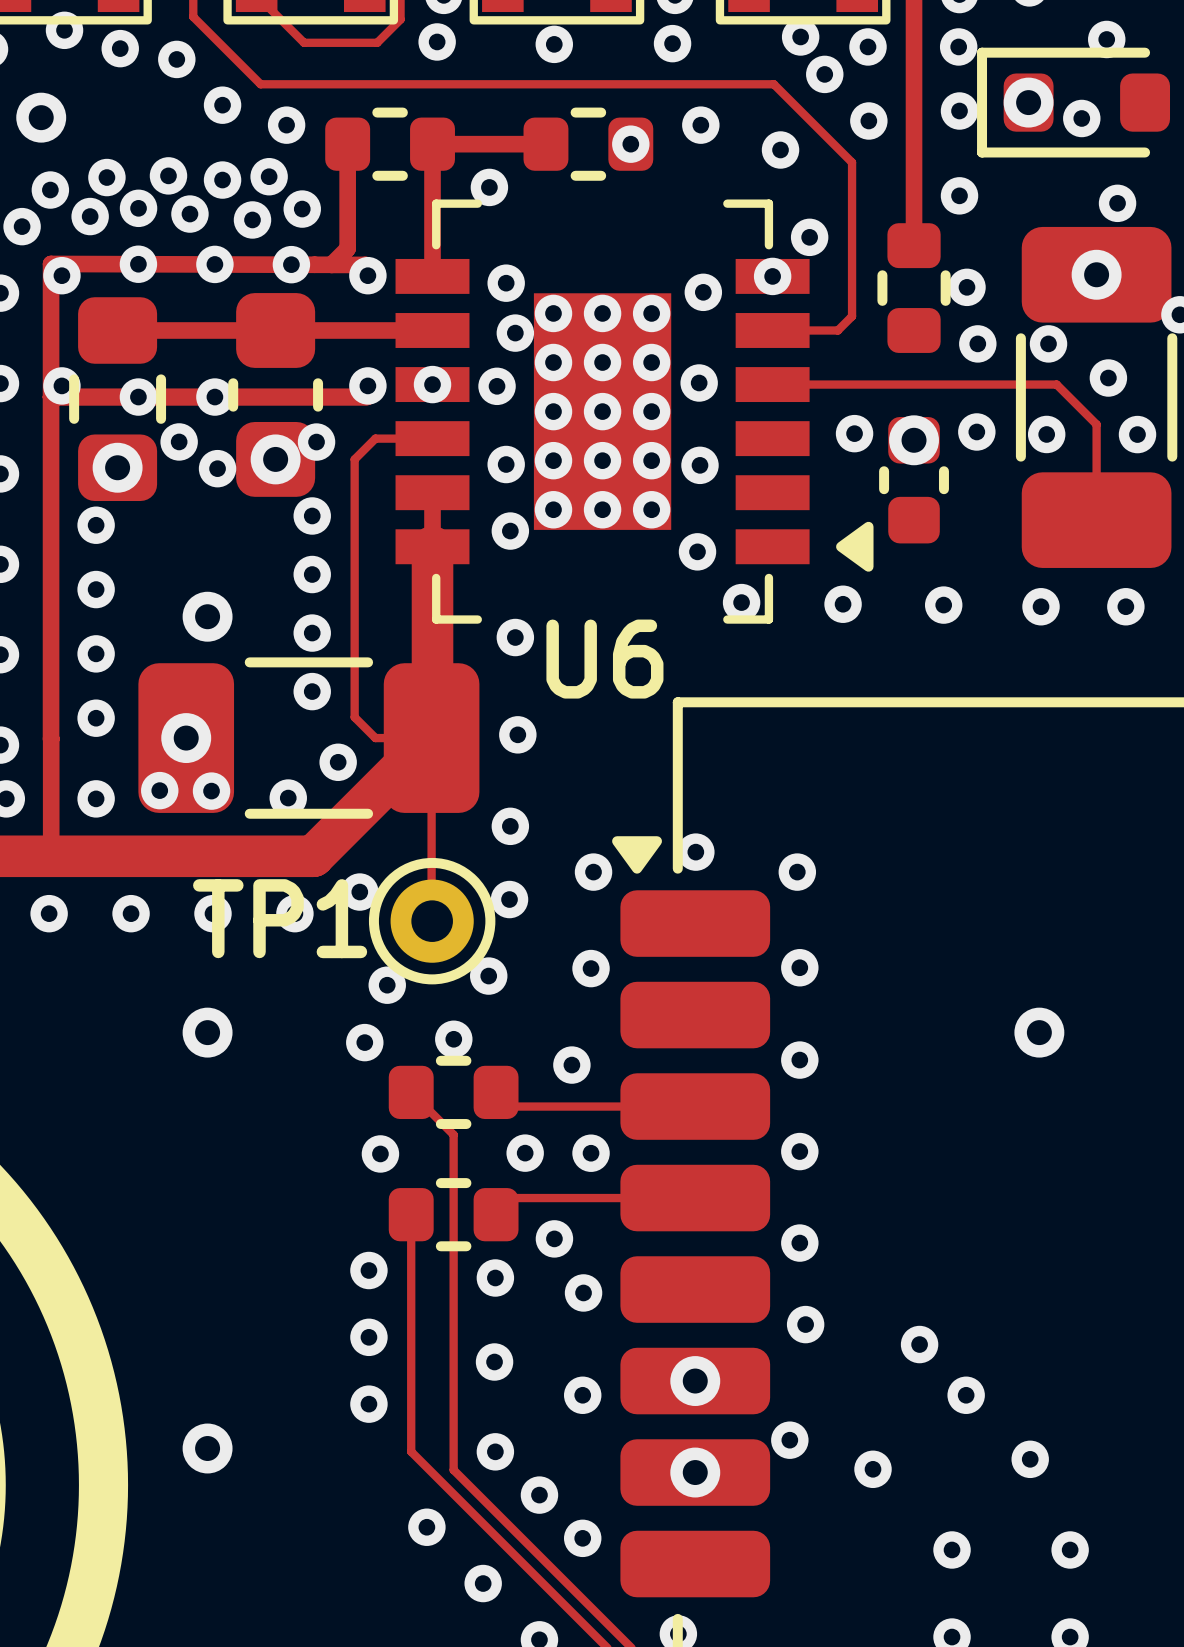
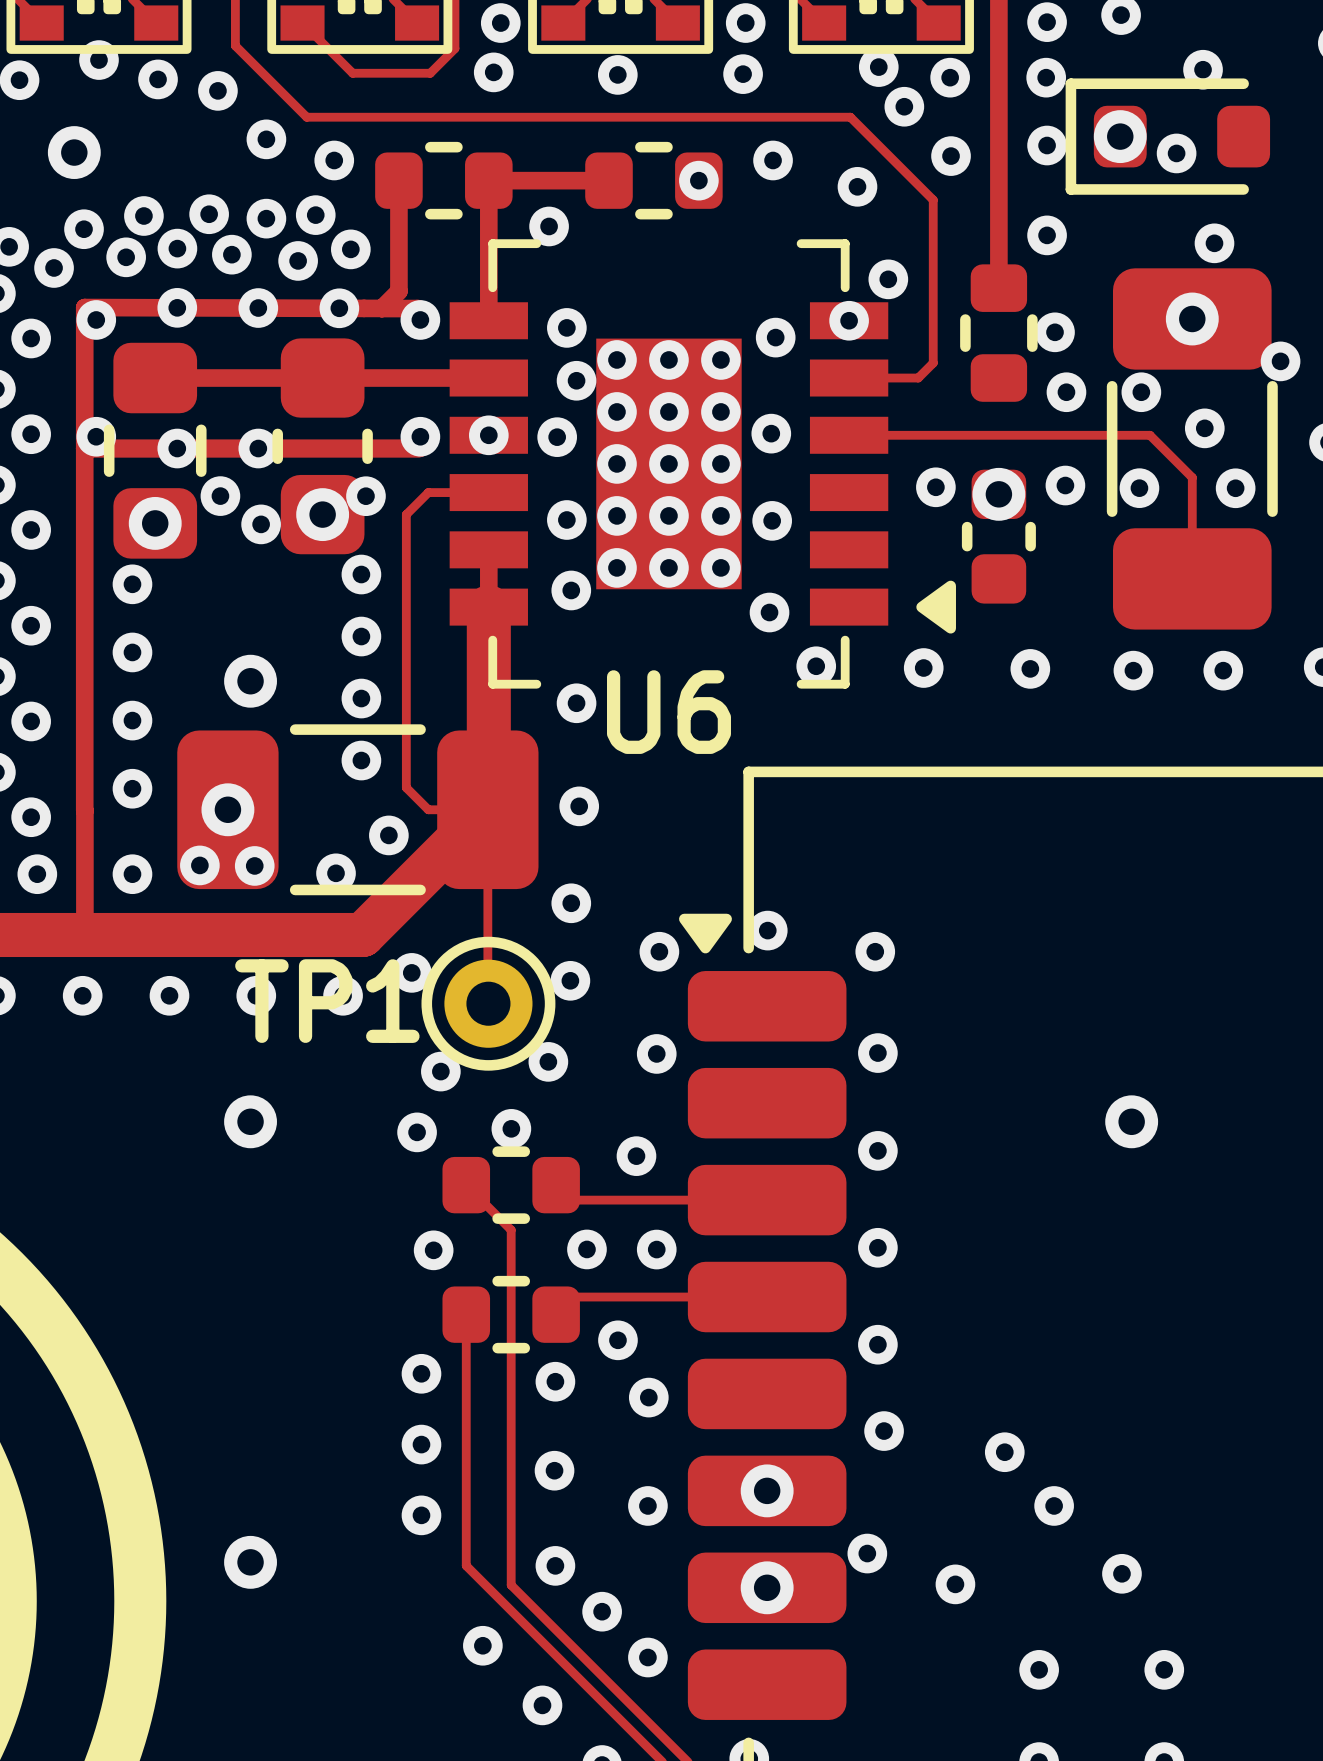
U6 name position: U6 (604, 659) -> U6 (668, 712)

